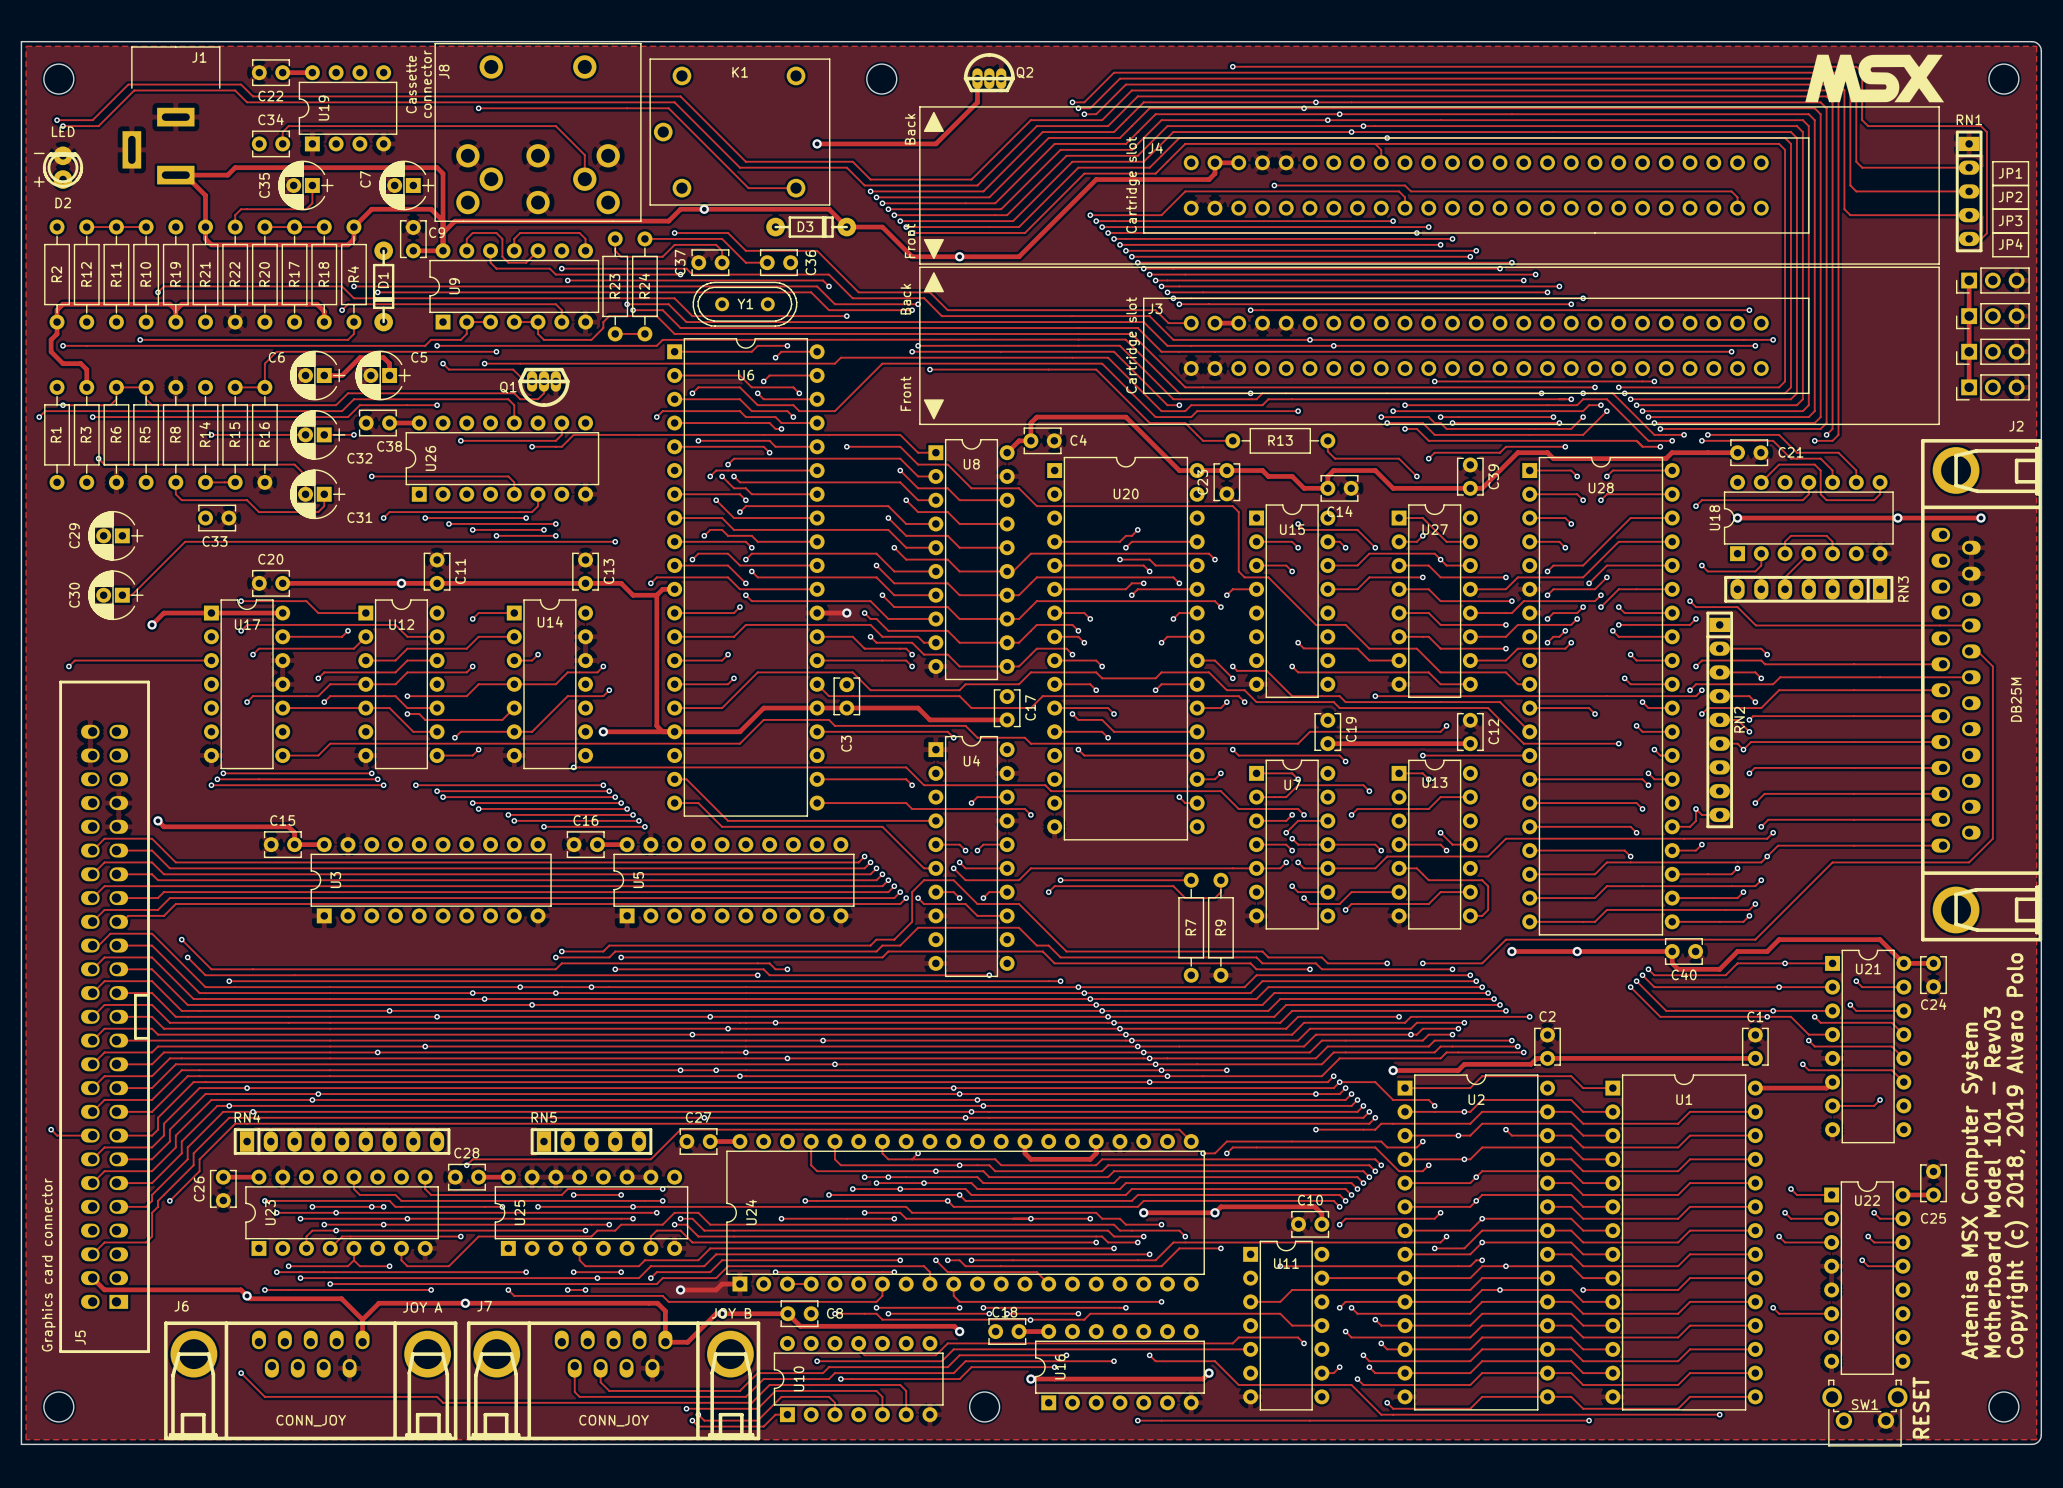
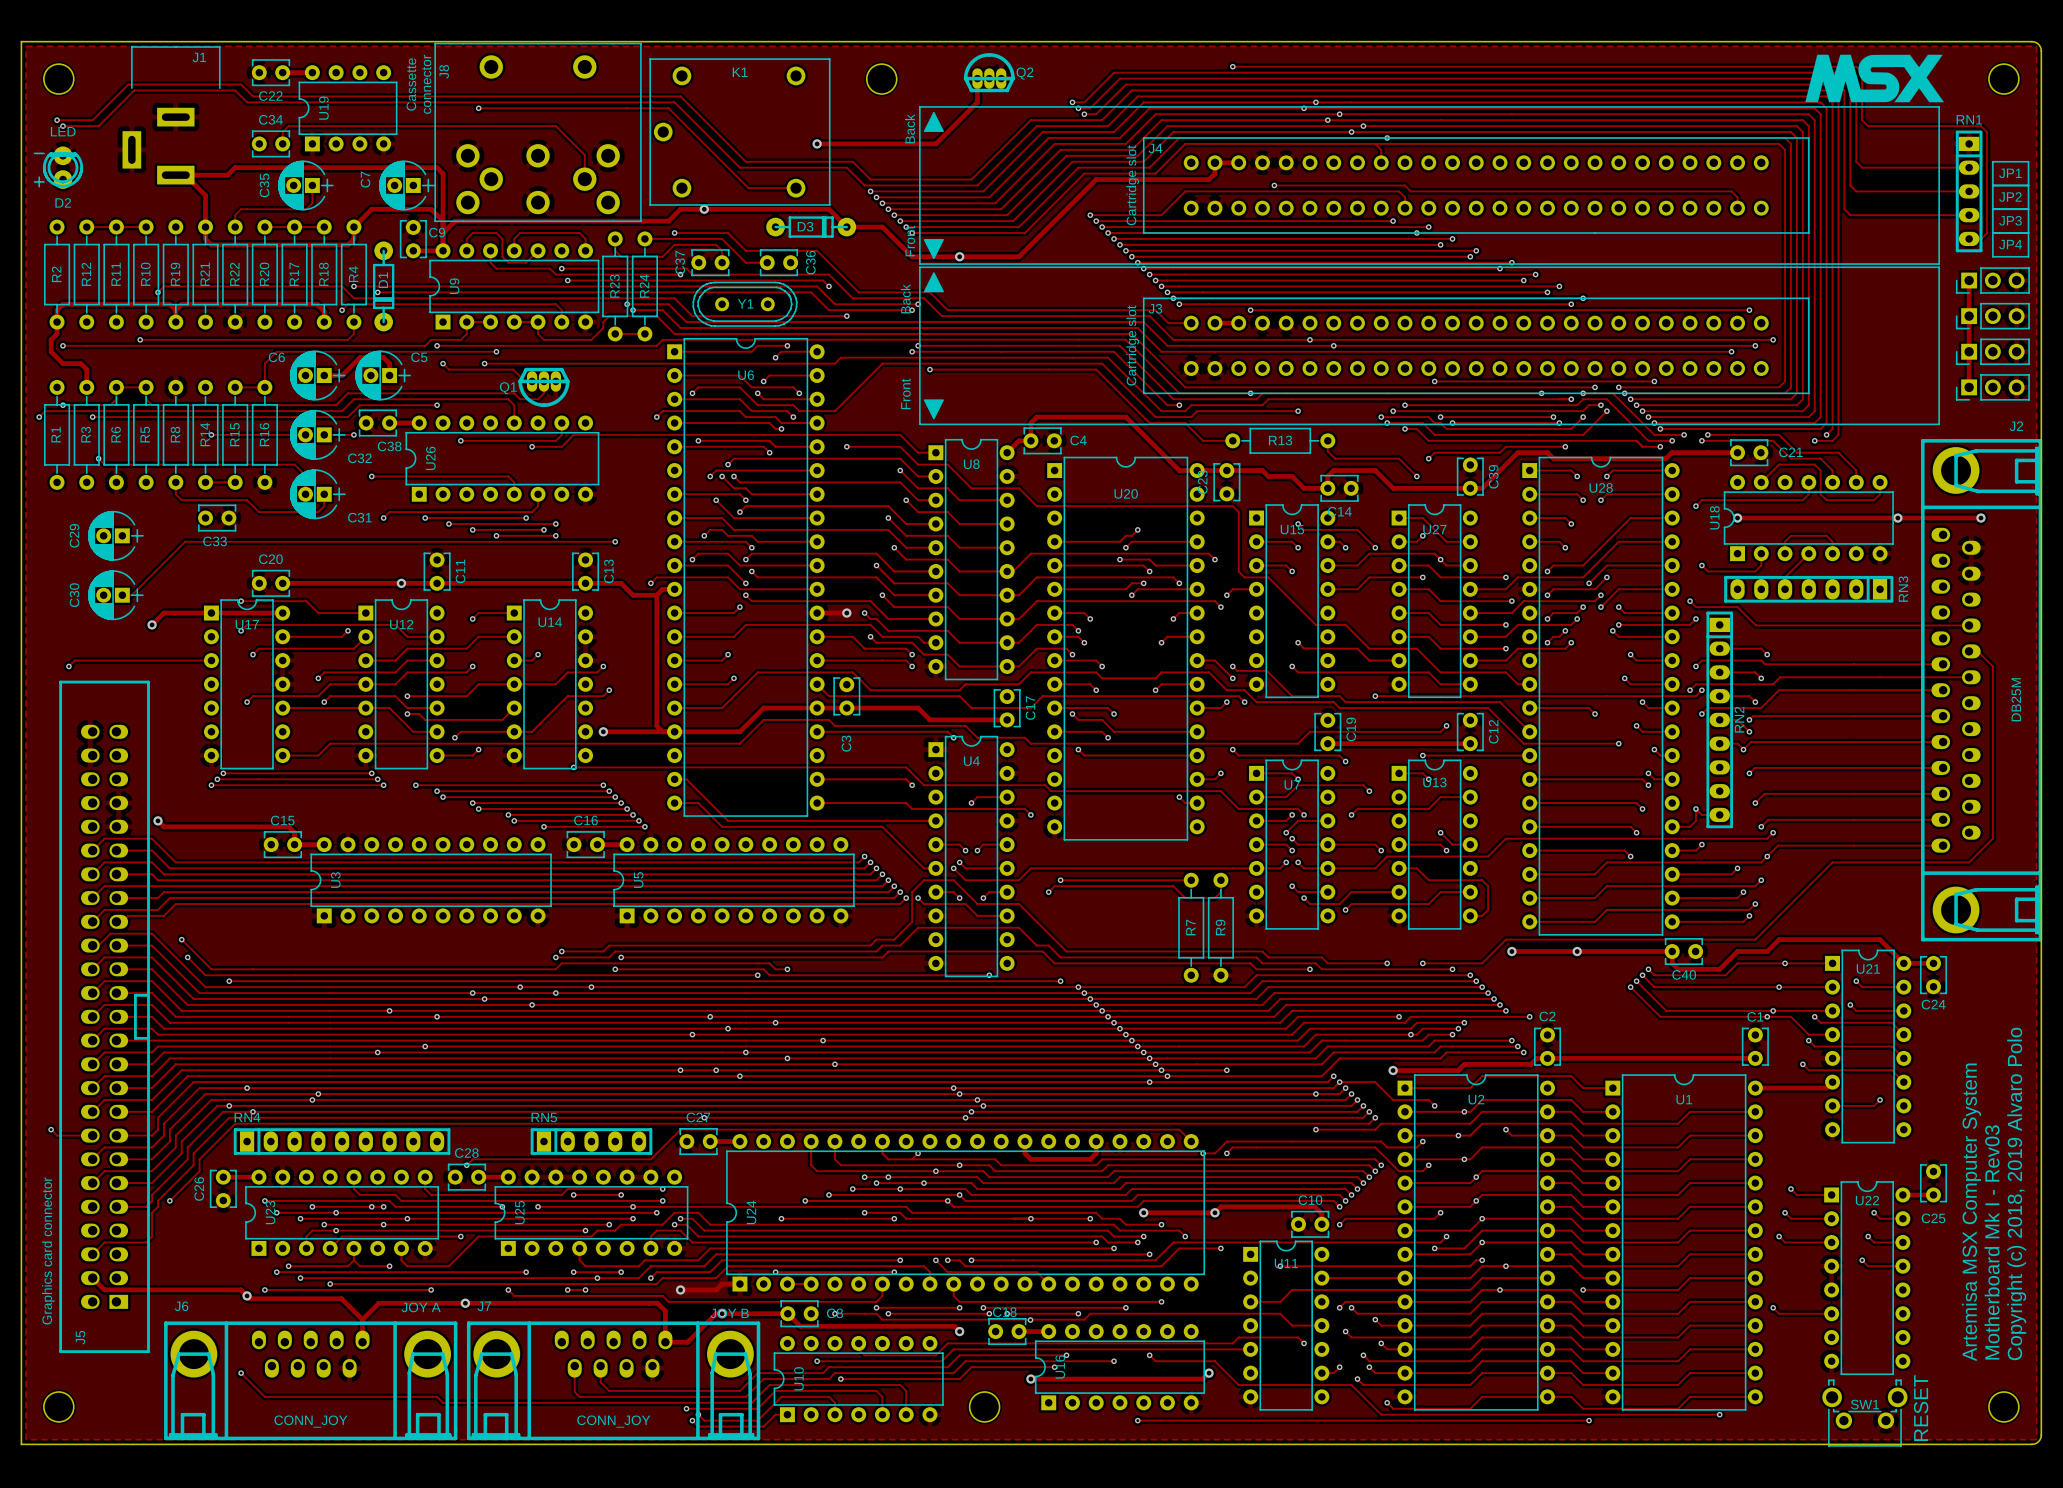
text: Motherboard Model 101 - Rev03 (1992, 1182) -> Motherboard Mk I - Rev03 (1992, 1242)

